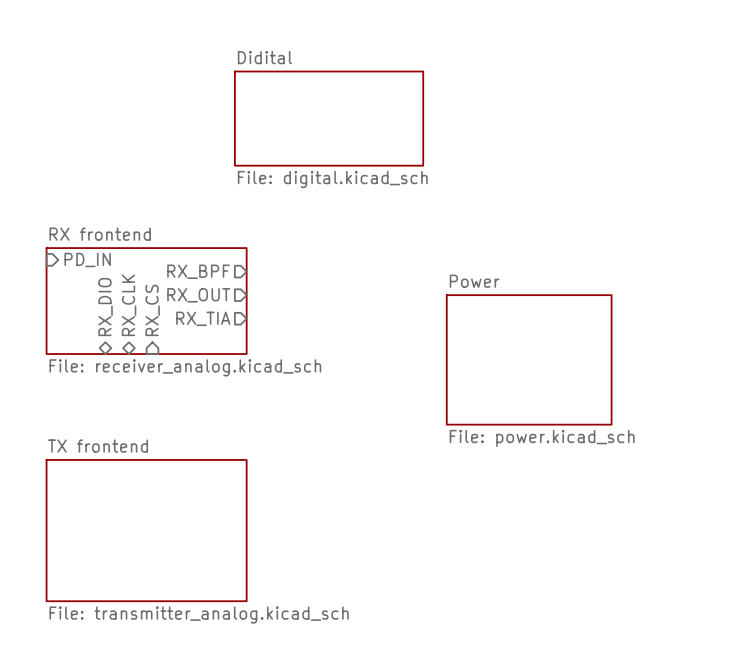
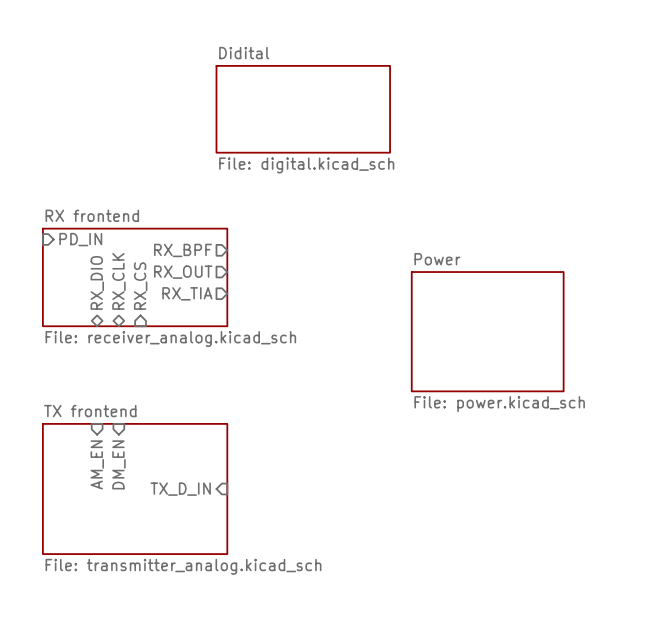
sheet pin: none -> AM_EN (97, 464)
sheet pin: none -> DM_EN (118, 464)
sheet pin: none -> TX_D_IN (180, 489)

